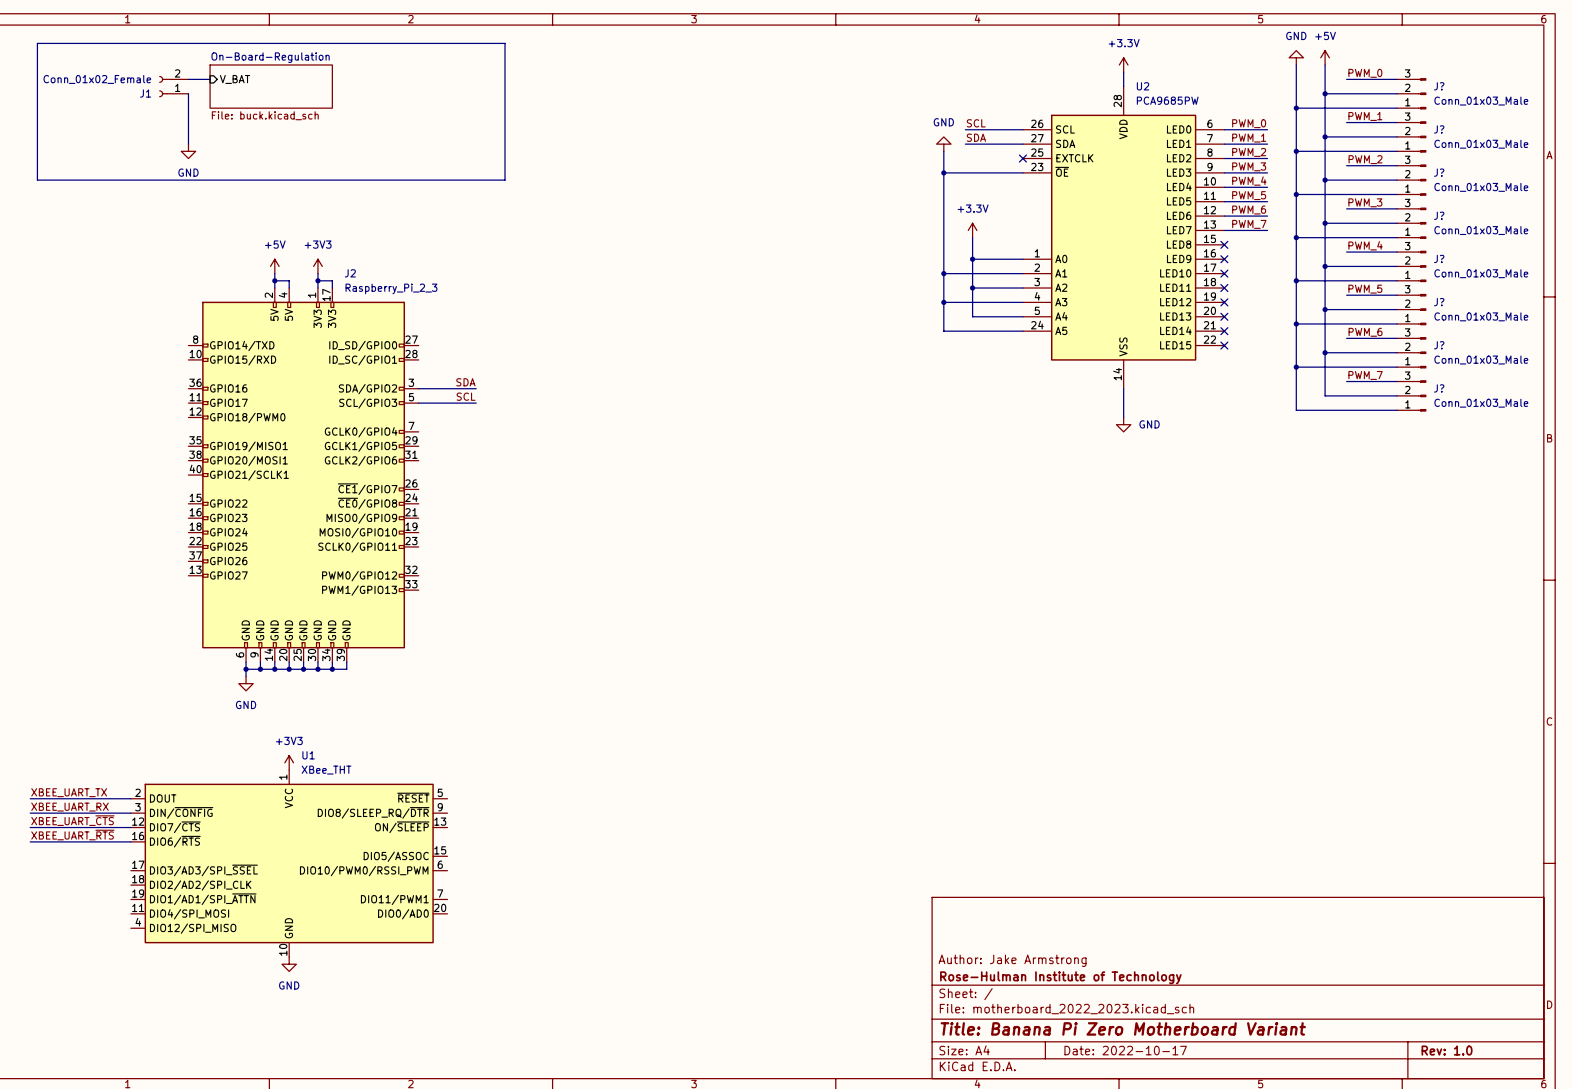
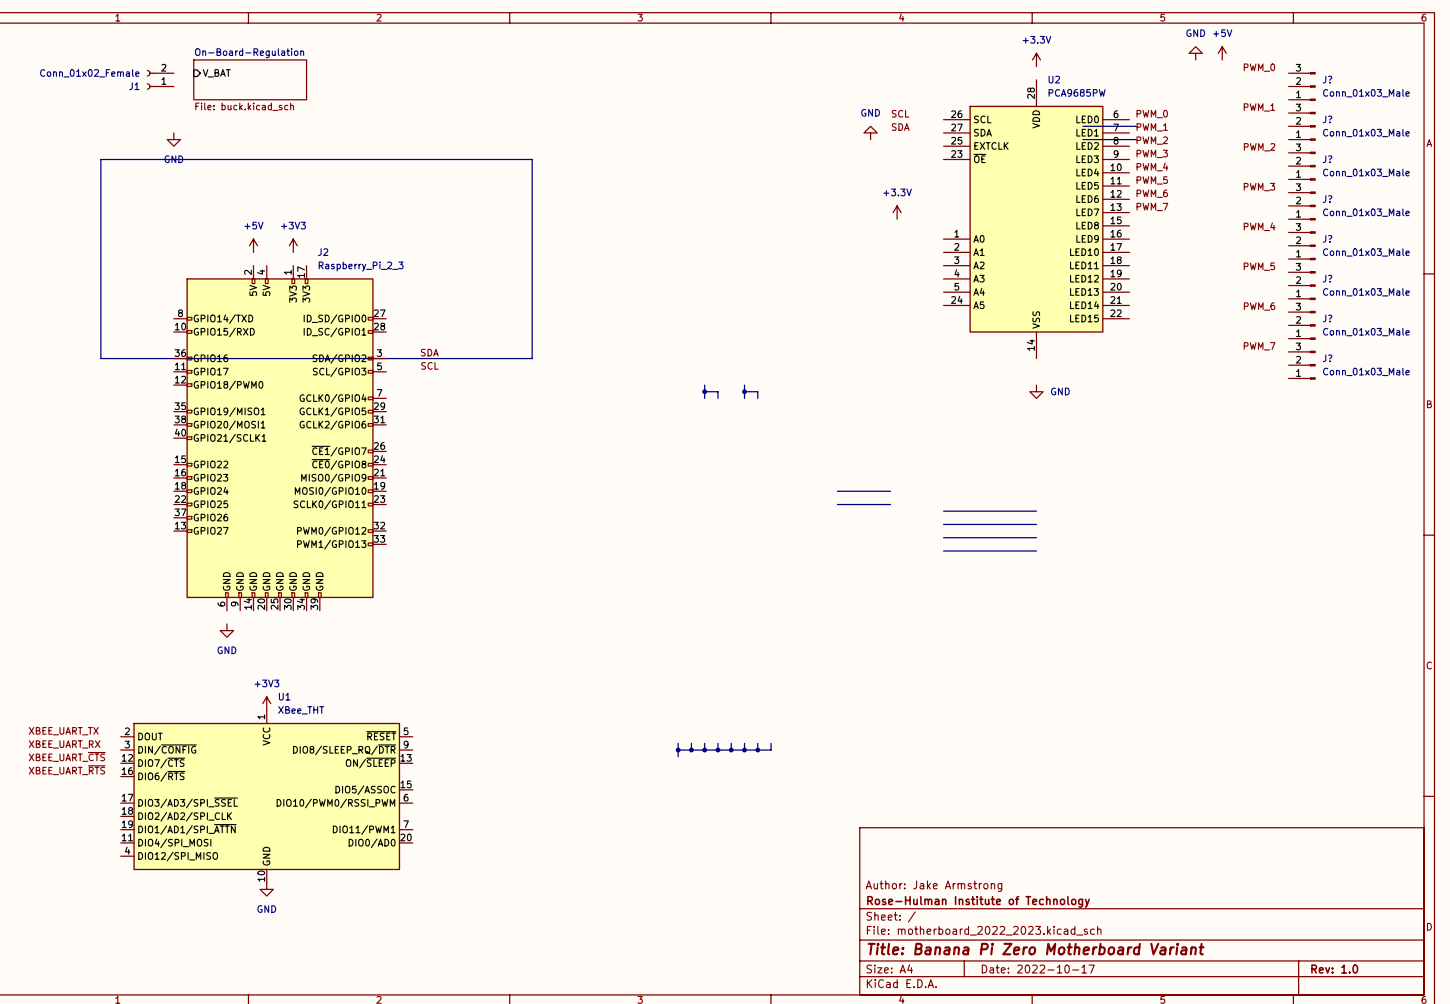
line: (37, 43) (505, 43) (505, 180) (37, 180) (37, 43) -> none
wire: (1296, 65) (1296, 410) (1397, 410) -> none
wire: (1325, 65) (1325, 395) (1397, 395) -> none
wire: (1123, 72) (1123, 86) -> none
wire: (188, 79) (210, 79) -> none
wire: (1346, 79) (1397, 79) -> none
wire: (188, 93) (188, 144) -> none
wire: (1325, 93) (1397, 93) -> none
junction: (1325, 93) -> none
wire: (1296, 108) (1397, 108) -> none
junction: (1296, 108) -> none
wire: (1346, 122) (1397, 122) -> none
wire: (965, 129) (1022, 129) -> none
wire: (1224, 129) (1267, 129) -> none
wire: none -> (1082, 126) (1135, 126)
wire: (1325, 136) (1397, 136) -> none
junction: (1325, 136) -> none
wire: (965, 144) (1022, 144) -> none
wire: (1224, 144) (1267, 144) -> none
wire: (943, 151) (943, 331) (1022, 331) -> none
wire: none -> (1082, 139) (1135, 139)
wire: (1296, 151) (1397, 151) -> none
junction: (1296, 151) -> none
no-connect mark: (1022, 158) -> none
wire: (1224, 158) (1267, 158) -> none
wire: (1346, 165) (1397, 165) -> none
line: none -> (100, 159) (532, 159) (532, 358) (100, 358) (100, 159)
wire: (943, 172) (1022, 172) -> none
junction: (943, 172) -> none
wire: (1224, 172) (1267, 172) -> none
wire: (1325, 180) (1397, 180) -> none
junction: (1325, 180) -> none
wire: (1224, 187) (1267, 187) -> none
wire: (1296, 194) (1397, 194) -> none
junction: (1296, 194) -> none
wire: (1224, 201) (1267, 201) -> none
wire: (1346, 208) (1397, 208) -> none
wire: (1224, 216) (1267, 216) -> none
wire: (1325, 223) (1397, 223) -> none
junction: (1325, 223) -> none
wire: (1224, 230) (1267, 230) -> none
wire: (972, 237) (972, 316) (1022, 316) -> none
wire: (1296, 237) (1397, 237) -> none
junction: (1296, 237) -> none
no-connect mark: (1224, 244) -> none
wire: (1346, 252) (1397, 252) -> none
wire: (972, 259) (1022, 259) -> none
junction: (972, 259) -> none
no-connect mark: (1224, 259) -> none
wire: (1325, 266) (1397, 266) -> none
junction: (1325, 266) -> none
wire: (274, 273) (274, 288) -> none
wire: (317, 273) (317, 288) -> none
wire: (943, 273) (1022, 273) -> none
junction: (943, 273) -> none
no-connect mark: (1224, 273) -> none
wire: (274, 280) (289, 280) (289, 288) -> none
junction: (274, 280) -> none
wire: (317, 280) (332, 280) (332, 288) -> none
junction: (317, 280) -> none
wire: (1296, 280) (1397, 280) -> none
junction: (1296, 280) -> none
wire: (972, 288) (1022, 288) -> none
junction: (972, 288) -> none
no-connect mark: (1224, 288) -> none
wire: (1346, 295) (1397, 295) -> none
wire: (943, 302) (1022, 302) -> none
junction: (943, 302) -> none
no-connect mark: (1224, 302) -> none
wire: (1325, 309) (1397, 309) -> none
junction: (1325, 309) -> none
no-connect mark: (1224, 316) -> none
wire: (1296, 323) (1397, 323) -> none
junction: (1296, 323) -> none
no-connect mark: (1224, 331) -> none
wire: (1346, 338) (1397, 338) -> none
no-connect mark: (1224, 345) -> none
wire: (1325, 352) (1397, 352) -> none
junction: (1325, 352) -> none
wire: (1296, 367) (1397, 367) -> none
junction: (1296, 367) -> none
wire: (1346, 381) (1397, 381) -> none
wire: (1123, 388) (1123, 417) -> none
wire: (418, 403) (476, 403) -> none
wire: none -> (704, 385) (704, 398)
wire: none -> (744, 385) (744, 398)
wire: none -> (704, 391) (717, 391) (717, 398)
junction: none -> (704, 391)
wire: none -> (744, 391) (757, 391) (757, 398)
junction: none -> (744, 391)
wire: none -> (837, 491) (890, 491)
wire: none -> (837, 504) (890, 504)
wire: none -> (943, 511) (1036, 511)
wire: none -> (943, 524) (1036, 524)
wire: none -> (943, 537) (1036, 537)
wire: none -> (943, 550) (1036, 550)
wire: (246, 662) (246, 676) -> none
wire: (260, 662) (260, 669) -> none
wire: (274, 662) (274, 669) -> none
wire: (289, 662) (289, 669) -> none
wire: (303, 662) (303, 669) -> none
wire: (317, 662) (317, 669) -> none
wire: (332, 662) (332, 669) -> none
wire: (346, 662) (346, 669) (246, 669) -> none
junction: (246, 669) -> none
junction: (260, 669) -> none
junction: (274, 669) -> none
junction: (289, 669) -> none
junction: (303, 669) -> none
junction: (317, 669) -> none
junction: (332, 669) -> none
wire: (30, 798) (130, 798) -> none
wire: none -> (678, 743) (678, 756)
wire: none -> (691, 743) (691, 750)
wire: none -> (704, 743) (704, 750)
wire: none -> (717, 743) (717, 750)
wire: none -> (731, 743) (731, 750)
wire: none -> (744, 743) (744, 750)
wire: none -> (757, 743) (757, 750)
wire: none -> (771, 743) (771, 750) (678, 750)
wire: (30, 813) (130, 813) -> none
junction: none -> (678, 750)
junction: none -> (691, 750)
junction: none -> (704, 750)
junction: none -> (717, 750)
junction: none -> (731, 750)
junction: none -> (744, 750)
junction: none -> (757, 750)
wire: (30, 827) (130, 827) -> none
wire: (30, 841) (130, 841) -> none

